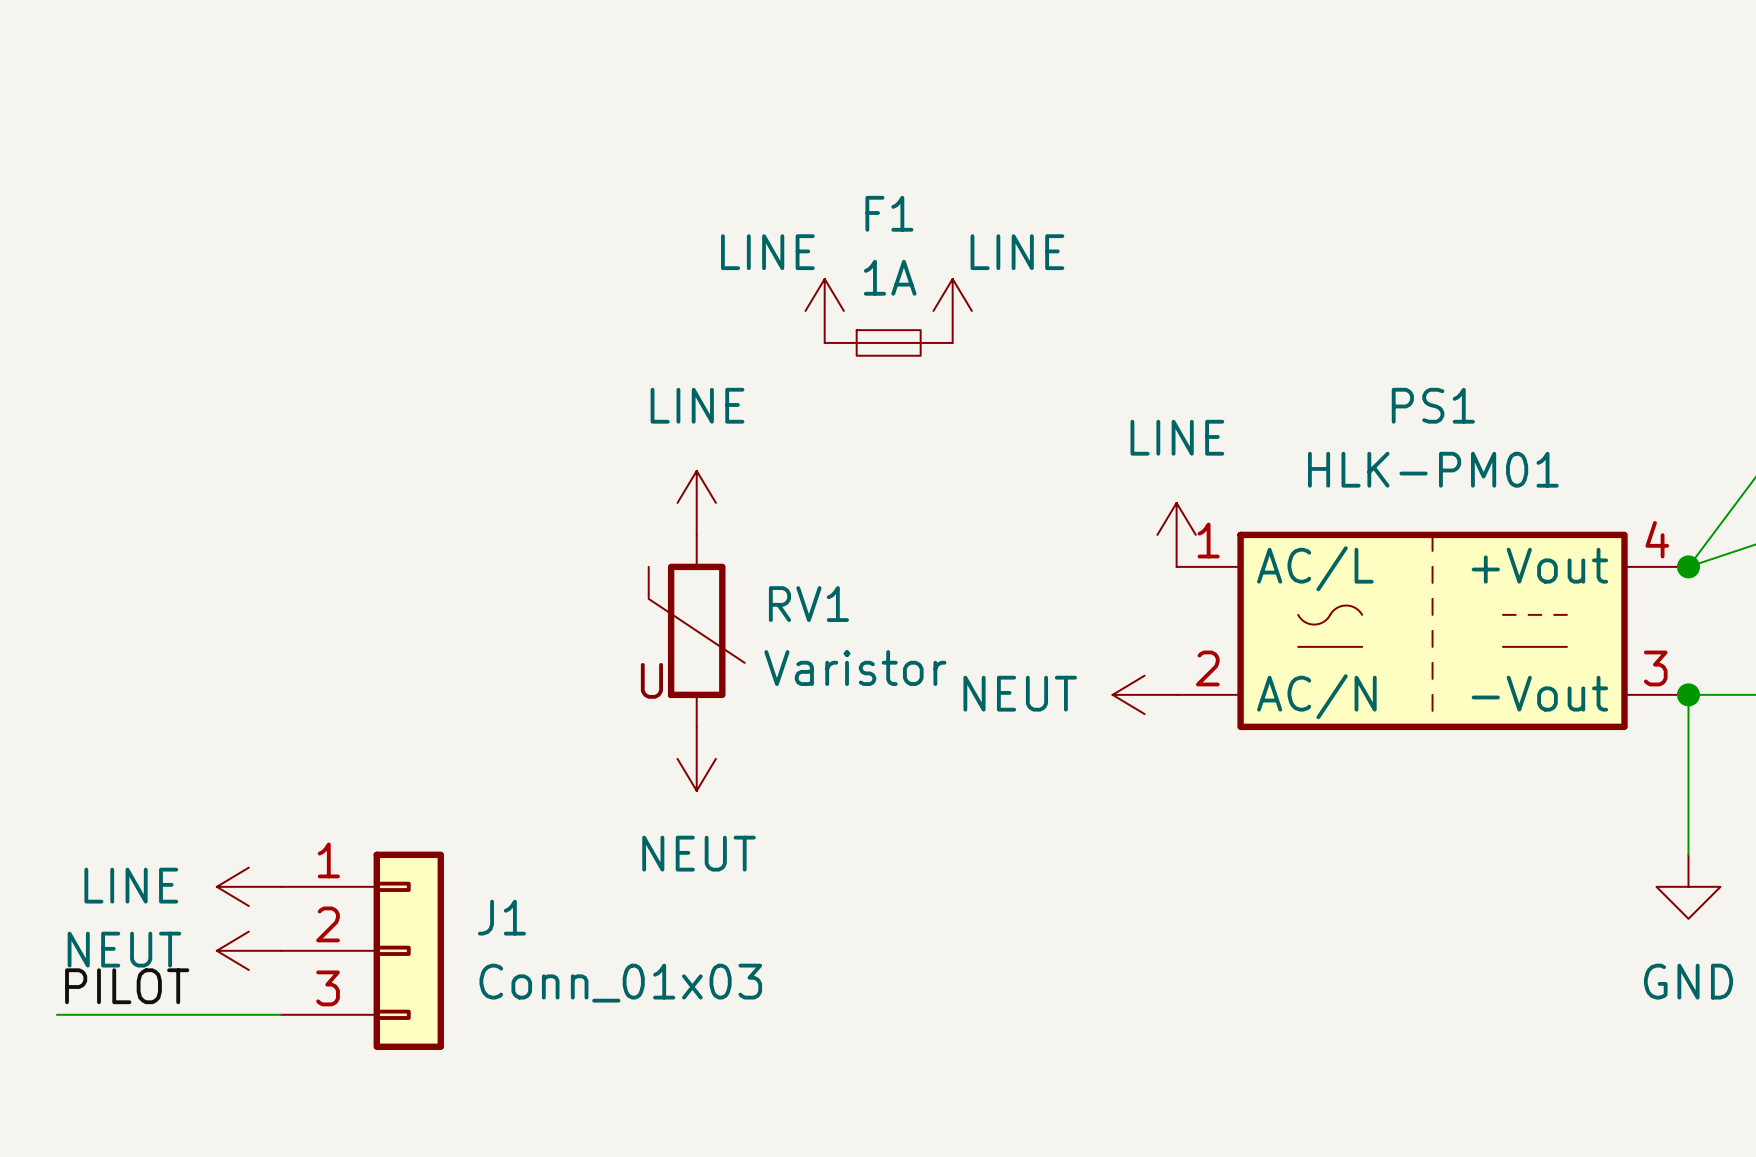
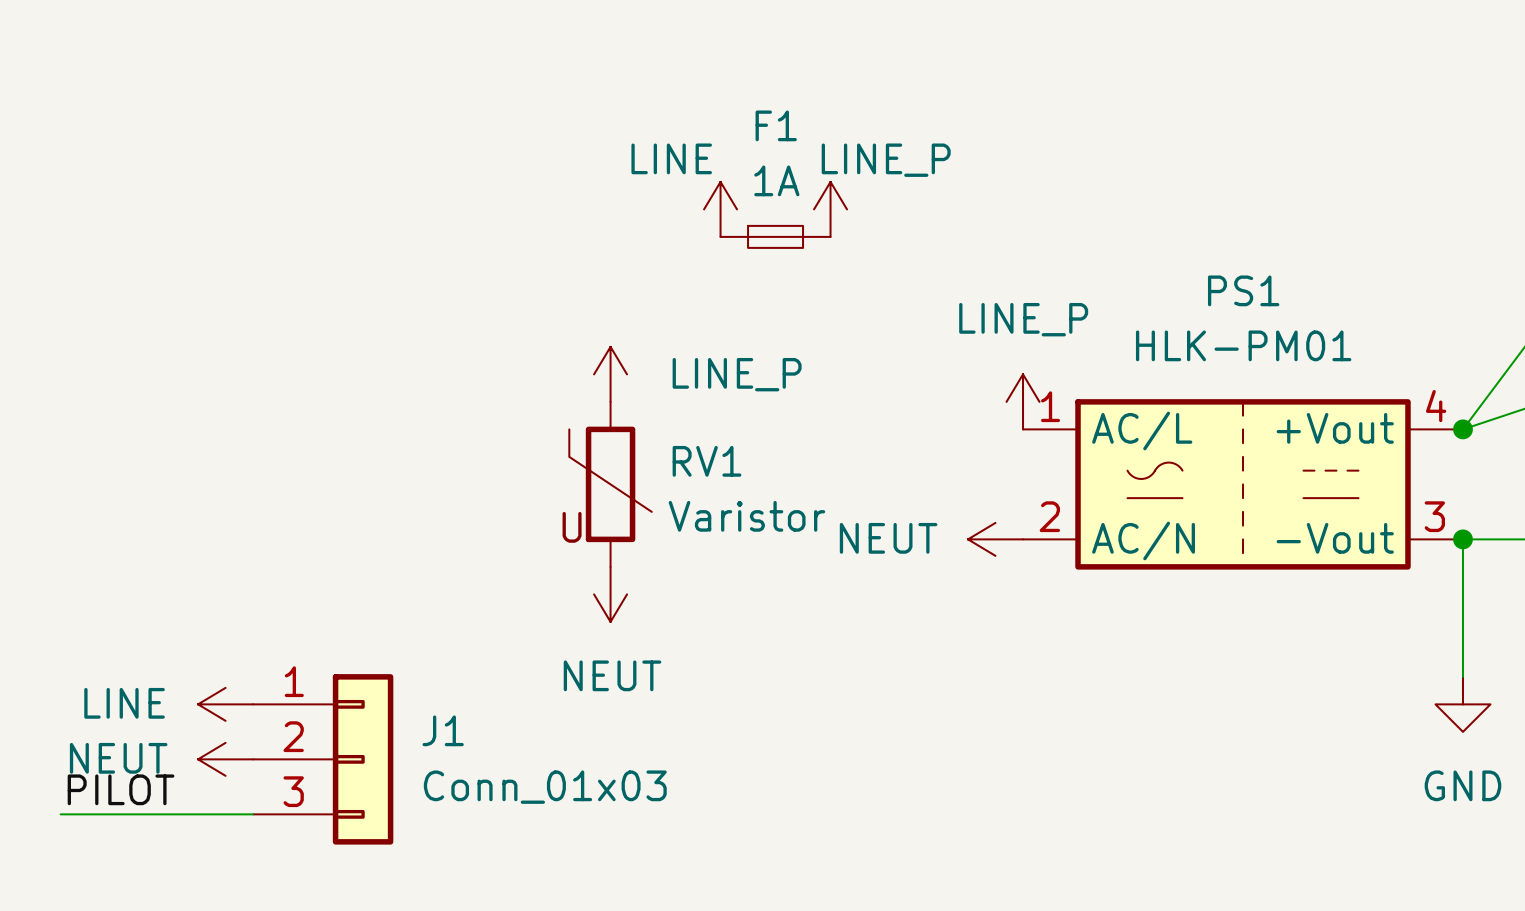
power symbol: LINE (952, 310) -> LINE_P (830, 209)
power symbol: LINE (696, 502) -> LINE_P (610, 374)
power symbol: LINE (1176, 534) -> LINE_P (1023, 401)

